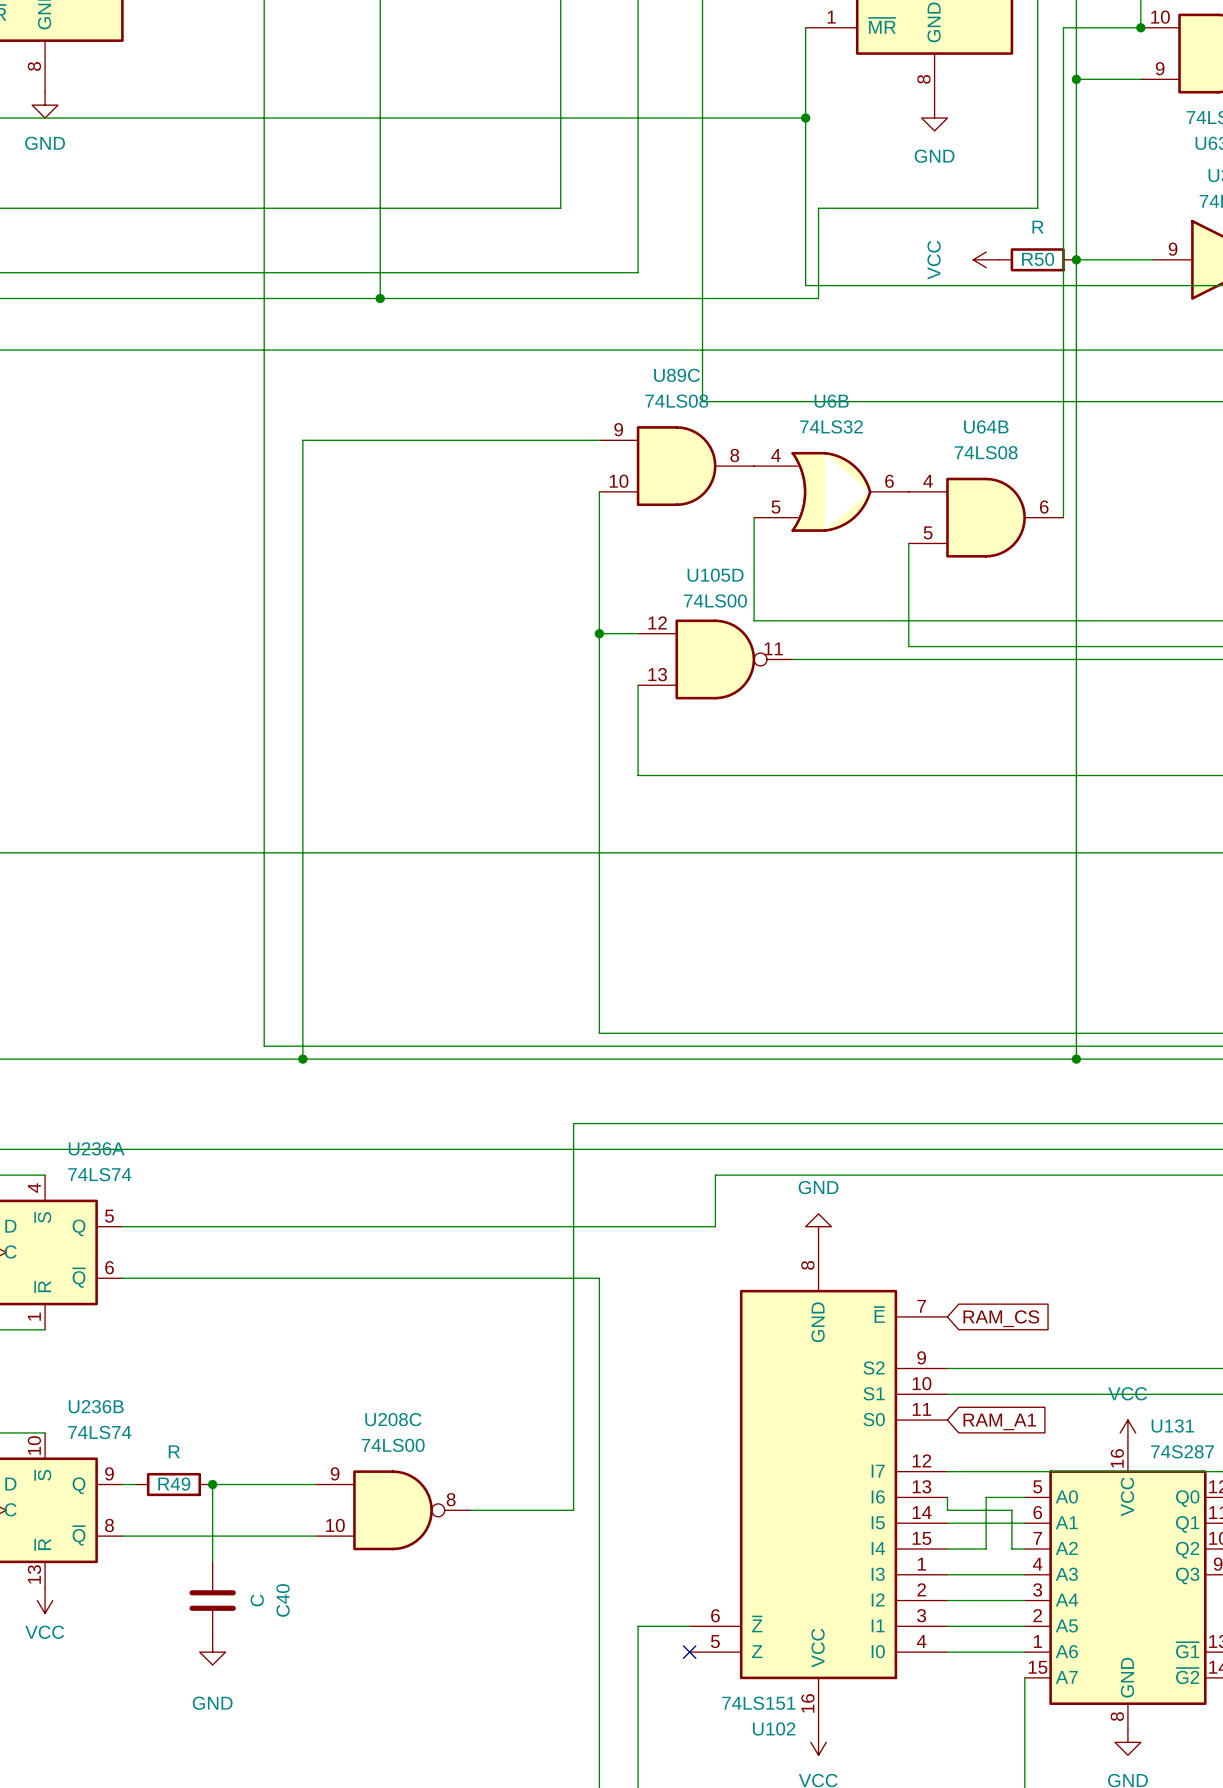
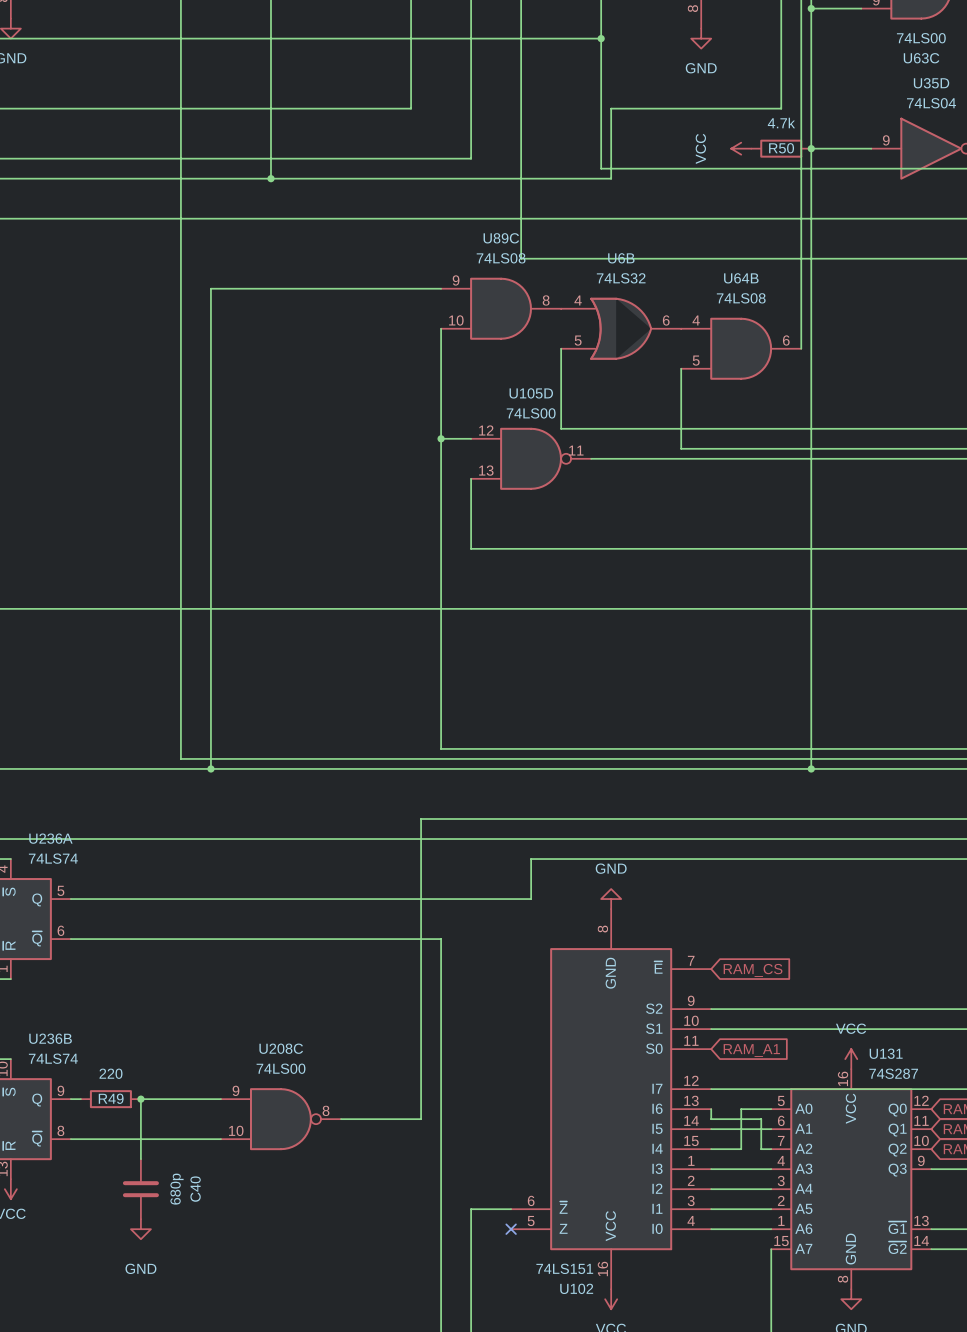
R50 value: R (1038, 227) -> 4.7k (781, 123)
R49 value: R (174, 1451) -> 220 (110, 1073)
C40 value: C (257, 1600) -> 680p (177, 1189)

